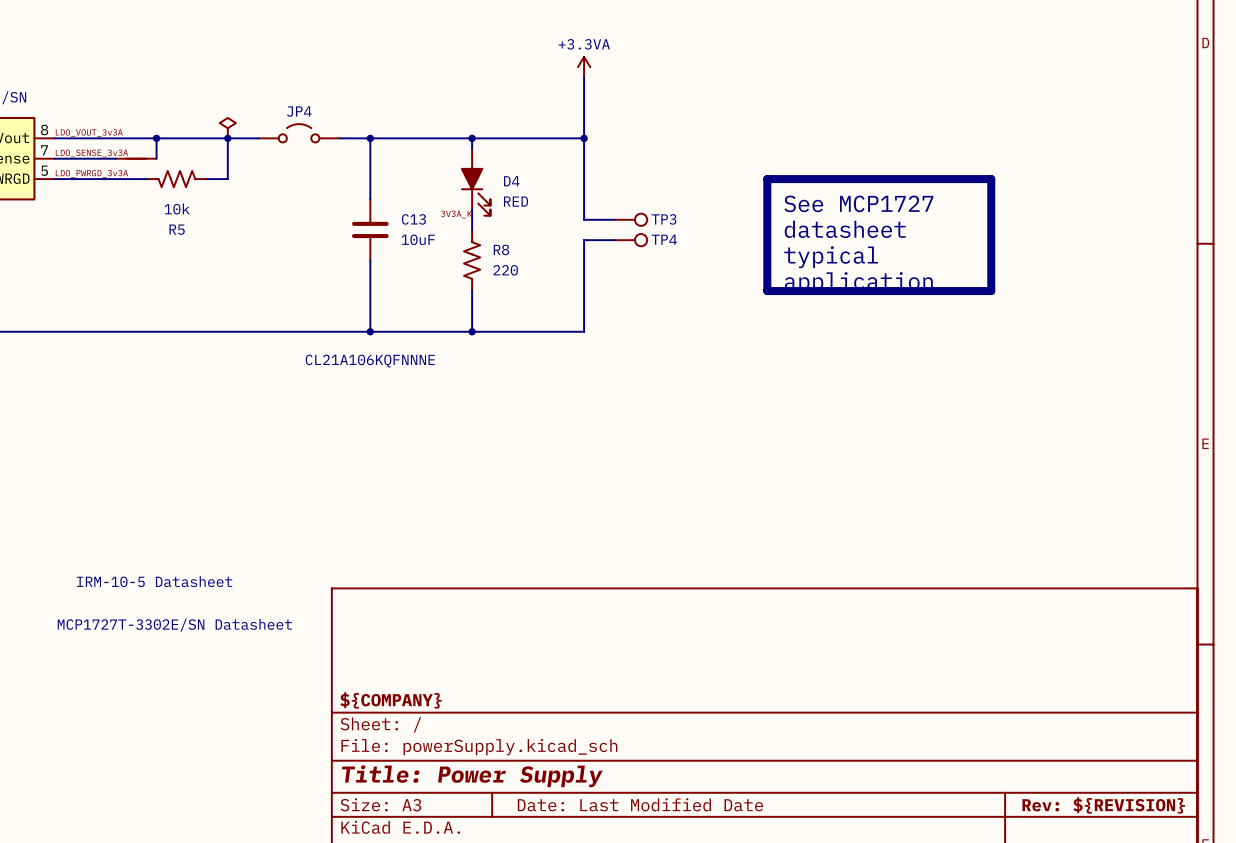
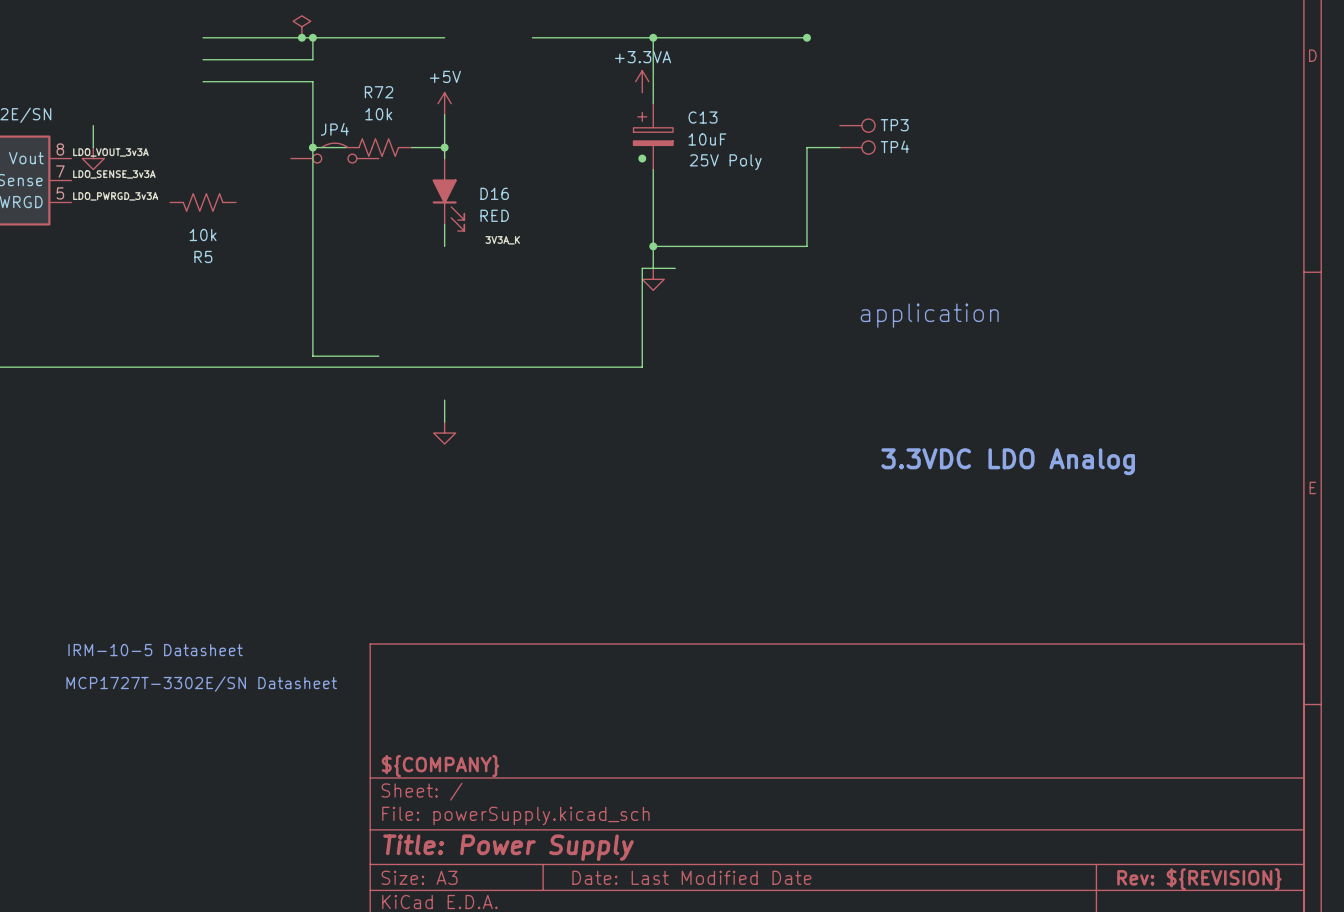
wire: none -> (203, 37) (444, 37)
junction: none -> (301, 37)
wire: none -> (312, 37) (312, 59) (203, 59)
junction: none -> (312, 37)
wire: none -> (532, 37) (806, 37)
wire: none -> (653, 37) (653, 103)
junction: none -> (653, 37)
junction: none -> (806, 37)
wire: none -> (203, 81) (312, 81) (312, 356) (378, 356)
wire: (584, 77) (584, 219) (594, 219) -> none
power symbol: none -> +5V (444, 103)
wire: none -> (444, 114) (444, 158)
power symbol position: (227, 128) -> (301, 26)
wire: none -> (312, 147) (345, 147)
junction: none -> (312, 147)
R72: none -> 10k (378, 147)
wire: none -> (411, 147) (444, 147)
wire: none -> (839, 147) (806, 147) (806, 246) (675, 246)
wire: (54, 138) (258, 138) -> none
power symbol: none -> (93, 158)
wire: (156, 138) (156, 158) -> (93, 125) (93, 147)
junction: (156, 138) -> none
wire: (227, 138) (227, 179) (207, 179) -> none
junction: (227, 138) -> none
wire: (339, 138) (584, 138) -> none
wire: (370, 138) (370, 199) -> none
junction position: (370, 138) -> (444, 147)
wire: (472, 138) (472, 148) -> none
junction: (472, 138) -> none
C13 text: none -> 25V Poly (725, 162)
wire: none -> (653, 169) (653, 268)
wire: (54, 158) (115, 158) -> none
part: (136, 158) -> none
D16: none -> RED (448, 194)
wire: (54, 179) (146, 179) -> none
line: (767, 179) (991, 179) (991, 291) (767, 291) (767, 179) -> none
D4: RED (475, 182) -> none
C13 symbol: [352, 199, 389, 261] -> [633, 103, 674, 170]
text: See MCP1727 (858, 203) -> none
wire: (472, 209) (472, 229) -> (444, 224) (444, 246)
junction: none -> (653, 246)
TP3 position: (630, 219) -> (857, 125)
text: datasheet (845, 229) -> none
TP4 position: (630, 240) -> (857, 147)
power symbol: none -> (653, 279)
text: typical (831, 257) -> none
wire: (370, 260) (370, 331) -> none
R8: 220 (472, 260) -> none
wire: (472, 291) (472, 331) -> none
junction: (370, 331) -> none
junction: (472, 331) -> none
text: CL21A106KQFNNNE (370, 361) -> none
wire: none -> (444, 400) (444, 422)
power symbol: none -> (444, 433)
text: none -> 3.3VDC LDO Analog (1008, 461)
text position: IRM-10-5 Datasheet (154, 581) -> IRM-10-5 Datasheet (155, 650)

